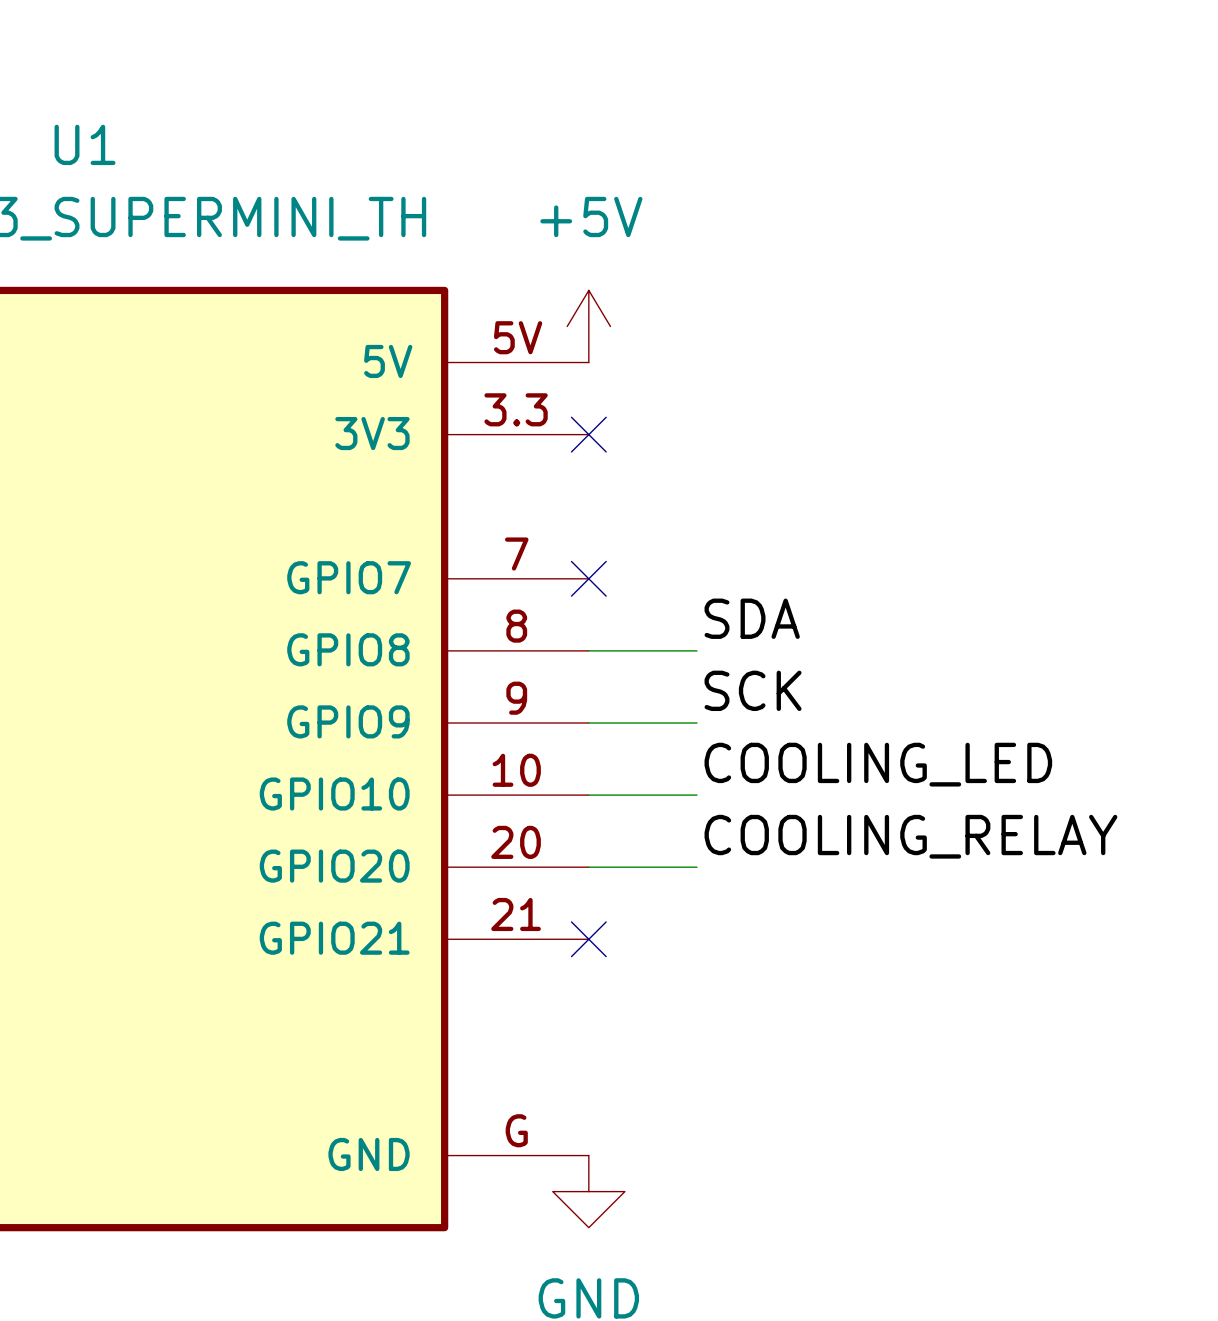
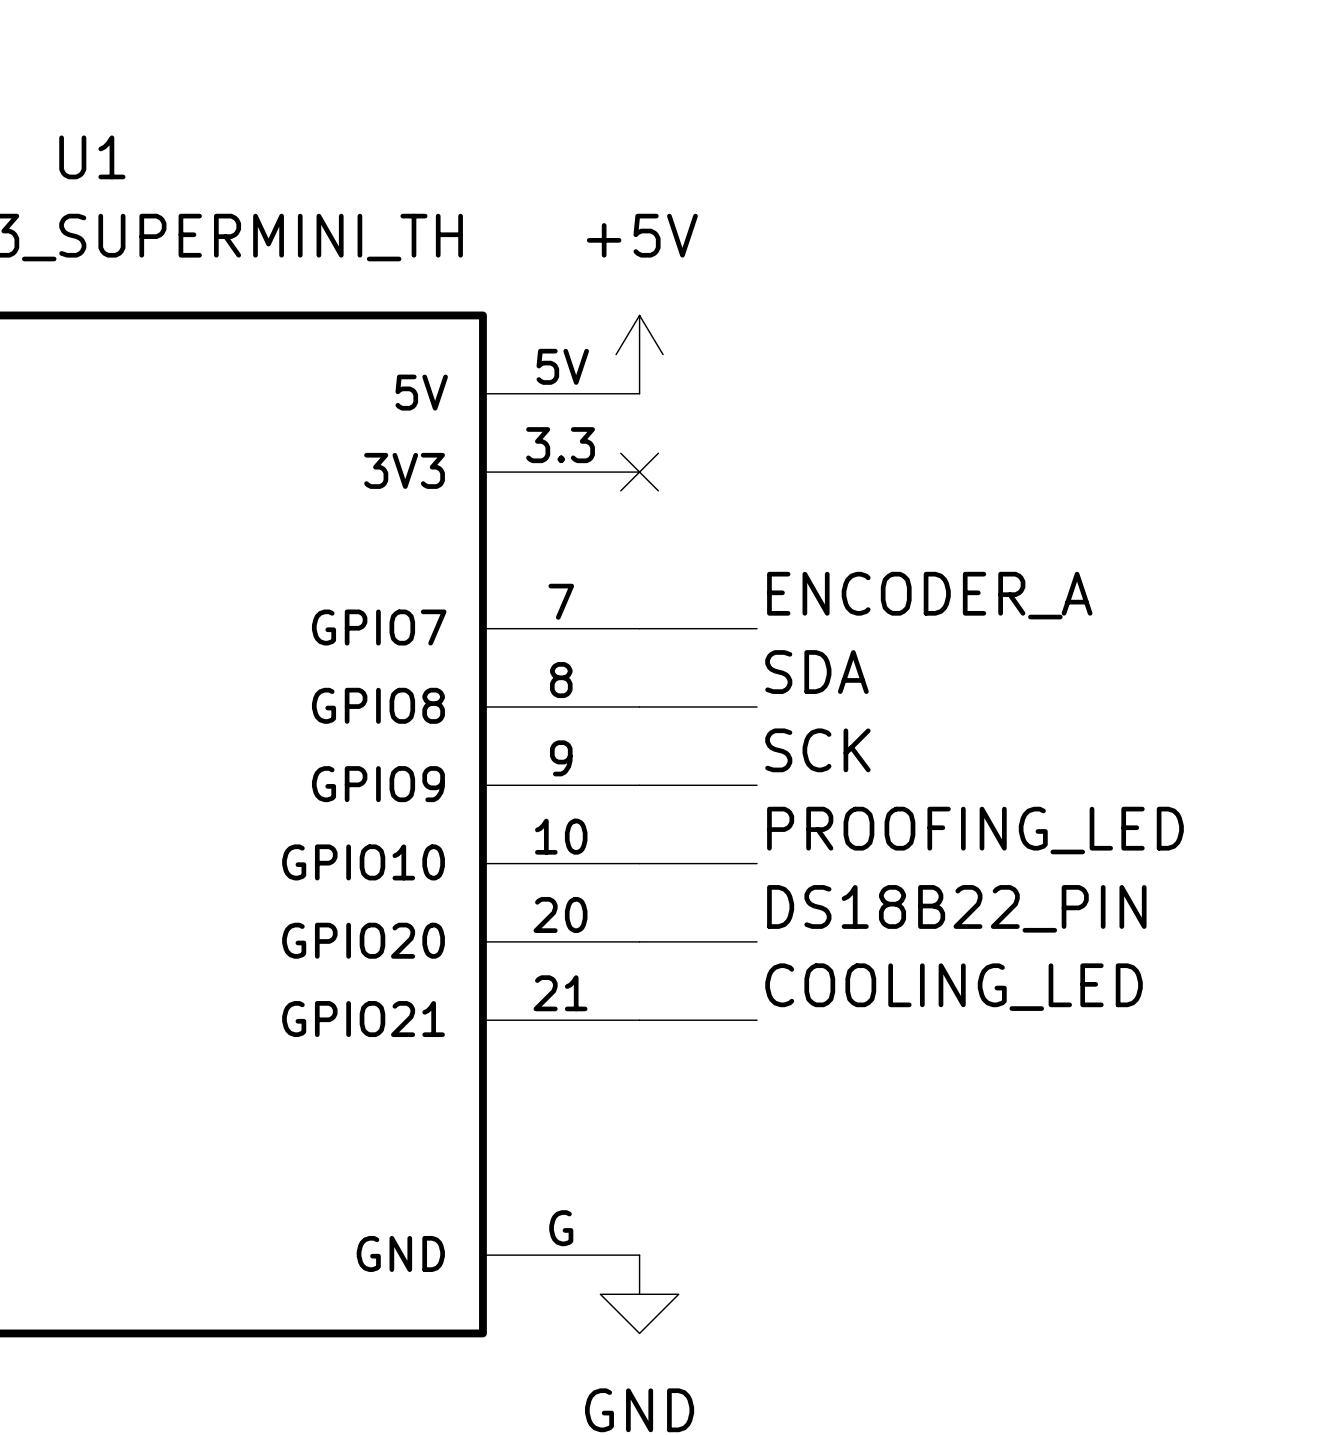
label: none -> ENCODER_A (929, 595)
wire: none -> (639, 628) (757, 628)
no-connect mark: (588, 578) -> none
label: COOLING_LED (878, 764) -> PROOFING_LED (975, 830)
label: COOLING_RELAY (910, 836) -> DS18B22_PIN (956, 908)
label: none -> COOLING_LED (954, 987)
wire: none -> (639, 1020) (757, 1020)
no-connect mark: (588, 939) -> none

